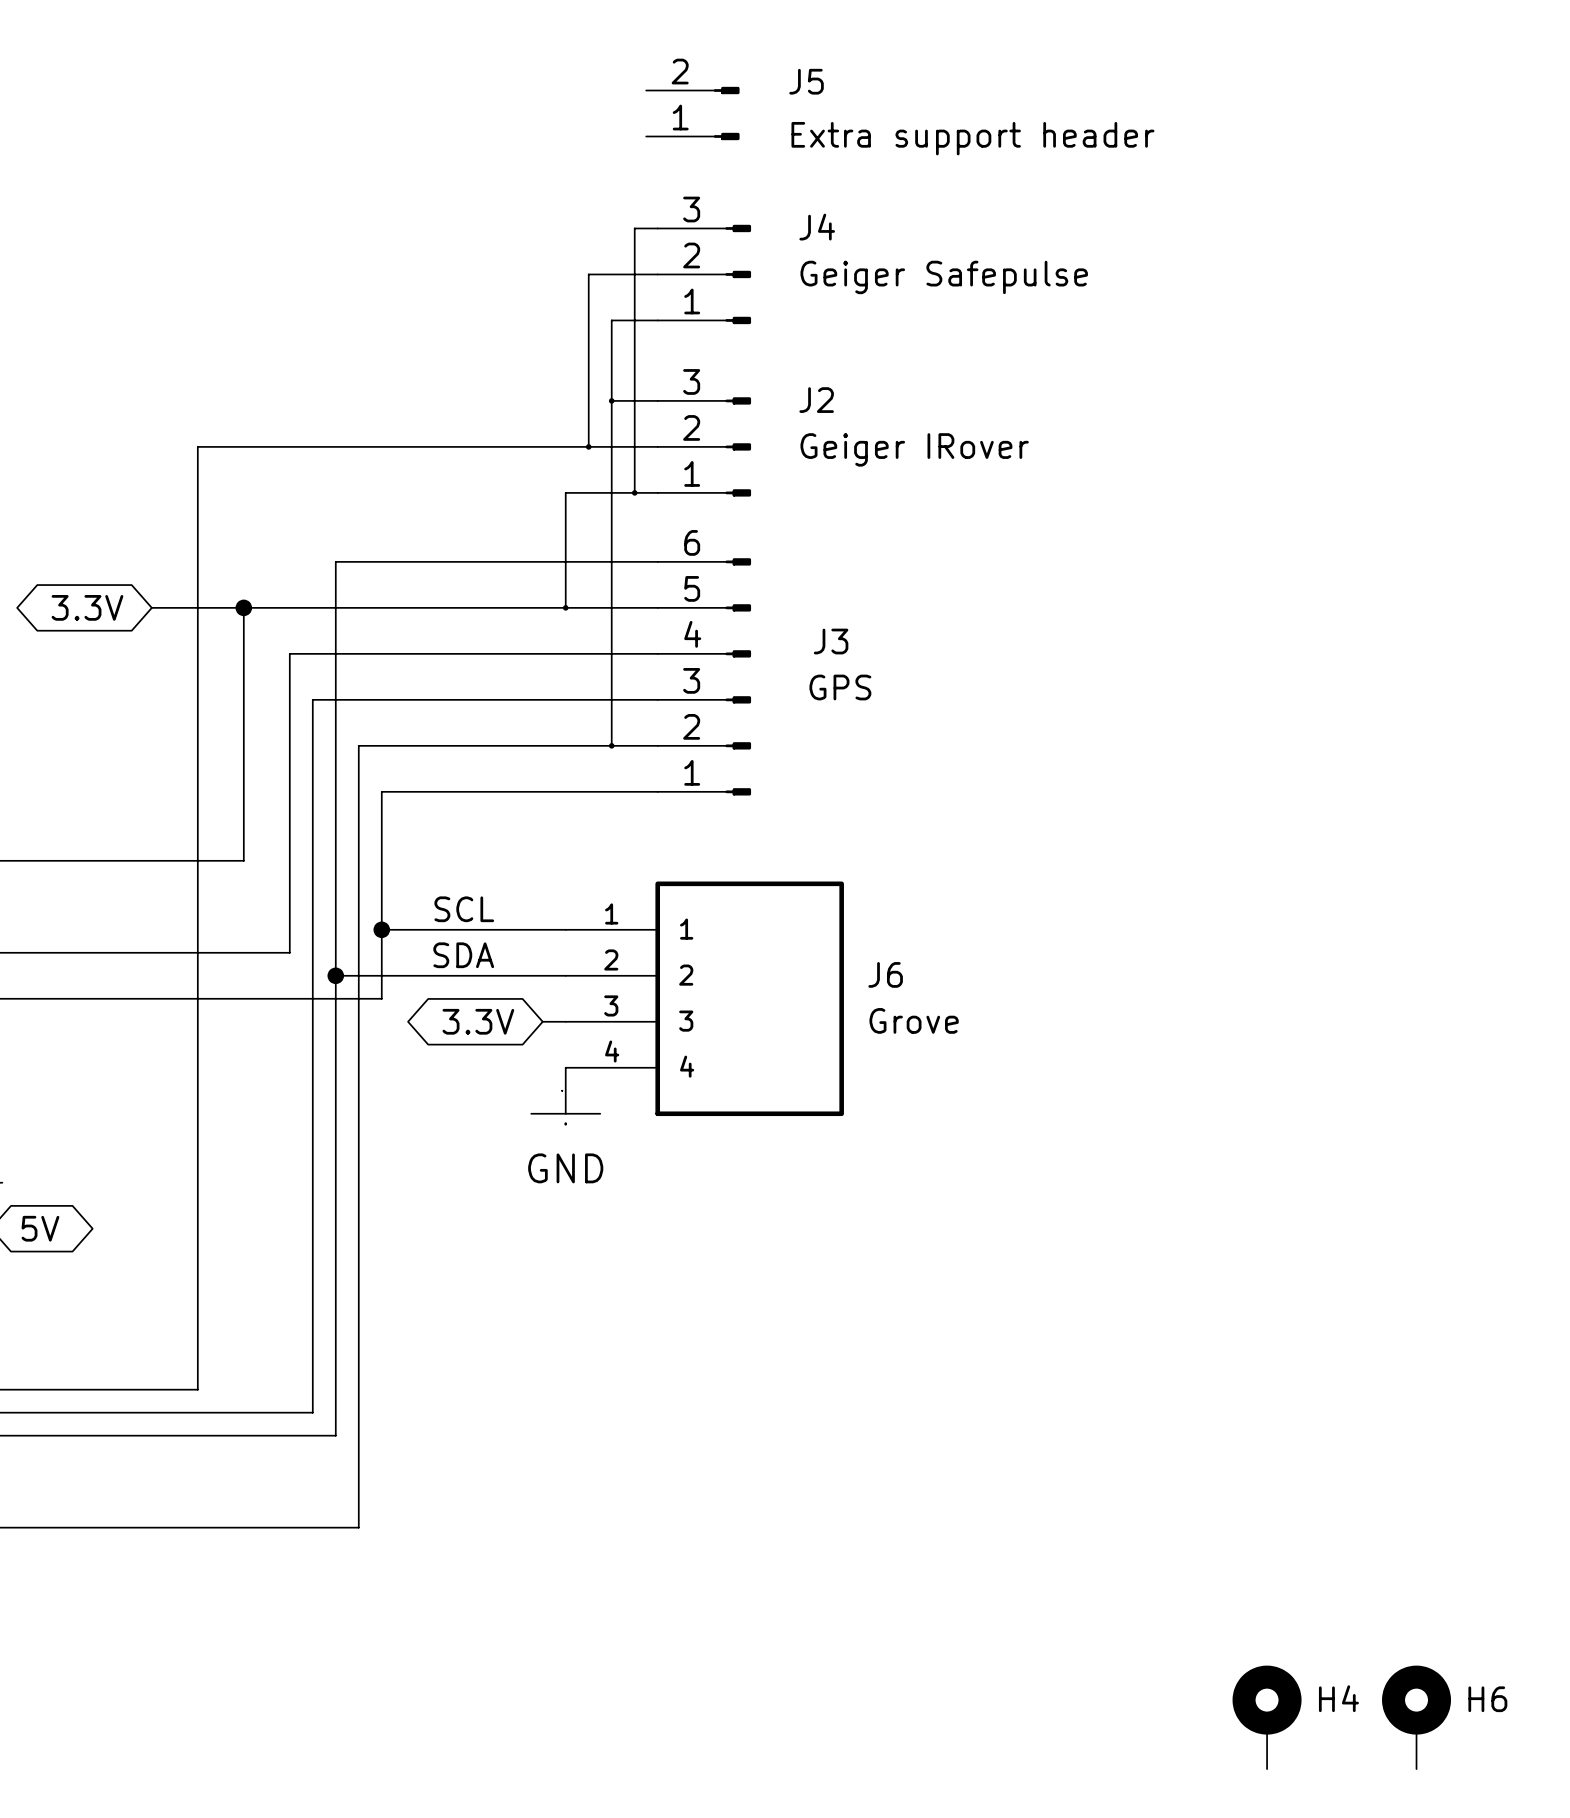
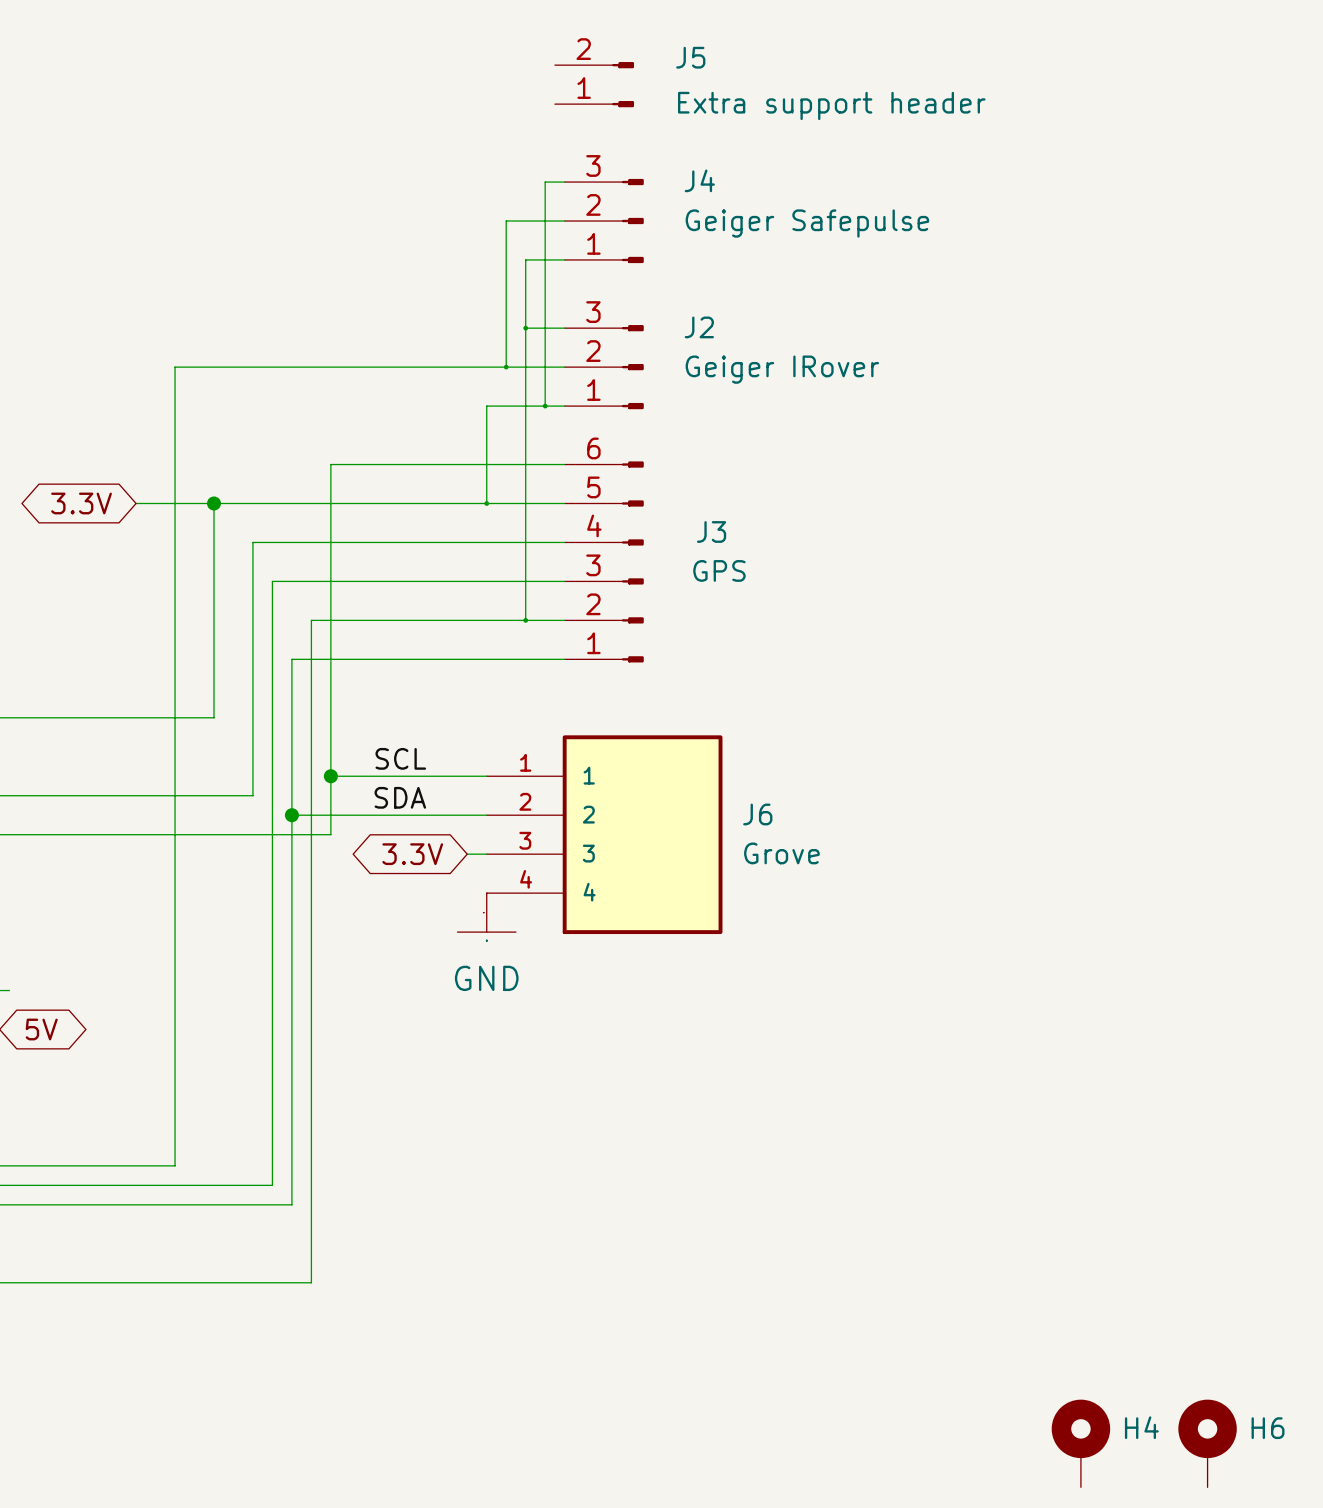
wire: (381, 561) (335, 561) (335, 791) -> (330, 464) (330, 659) (291, 659)

